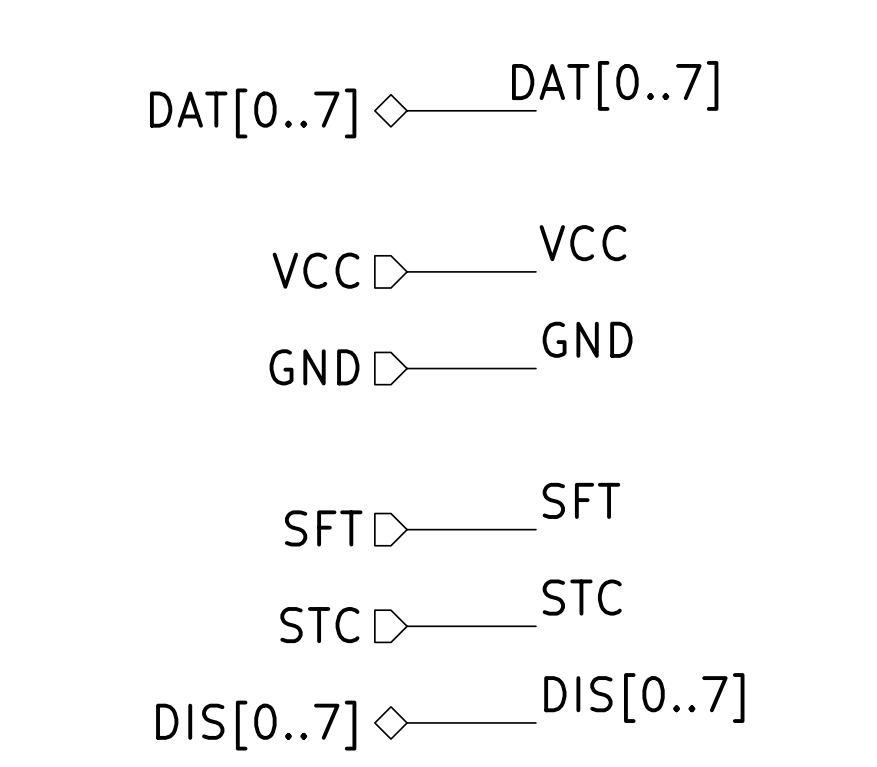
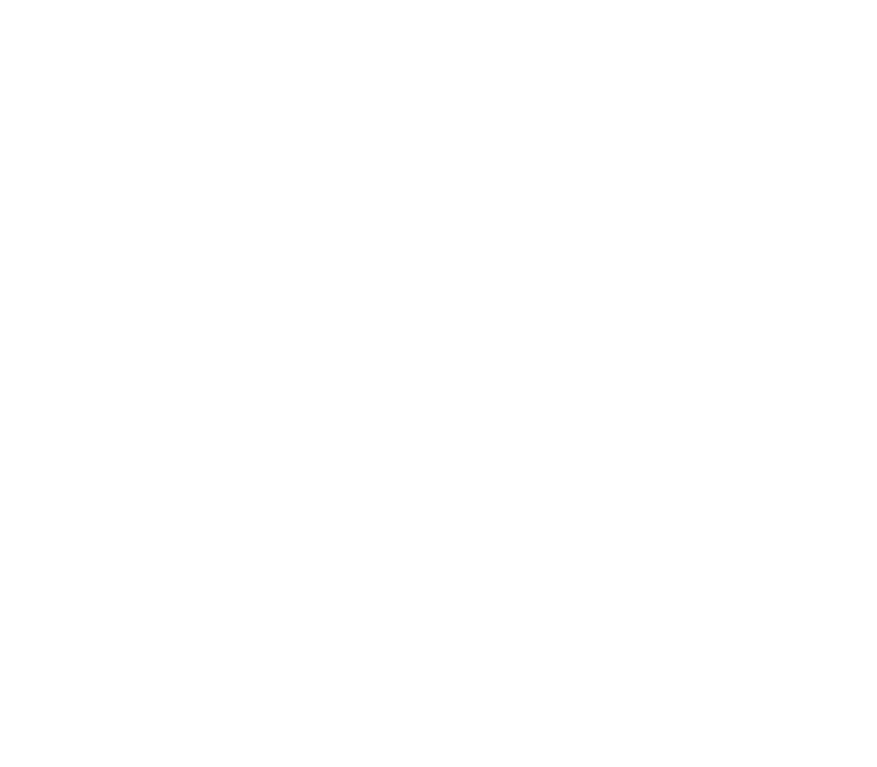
label: DAT[0..7] (615, 85) -> none
bus: (407, 110) (535, 110) -> none
hierarchical label: DAT[0..7] (253, 113) -> none
label: VCC (582, 243) -> none
hierarchical label: VCC (316, 270) -> none
wire: (407, 271) (535, 271) -> none
label: GND (587, 339) -> none
hierarchical label: GND (314, 367) -> none
wire: (407, 368) (535, 368) -> none
label: SFT (581, 500) -> none
hierarchical label: SFT (323, 528) -> none
wire: (407, 529) (535, 529) -> none
label: STC (582, 597) -> none
hierarchical label: STC (319, 625) -> none
wire: (407, 626) (535, 626) -> none
label: DIS[0..7] (644, 698) -> none
bus: (407, 722) (535, 722) -> none
hierarchical label: DIS[0..7] (256, 725) -> none

